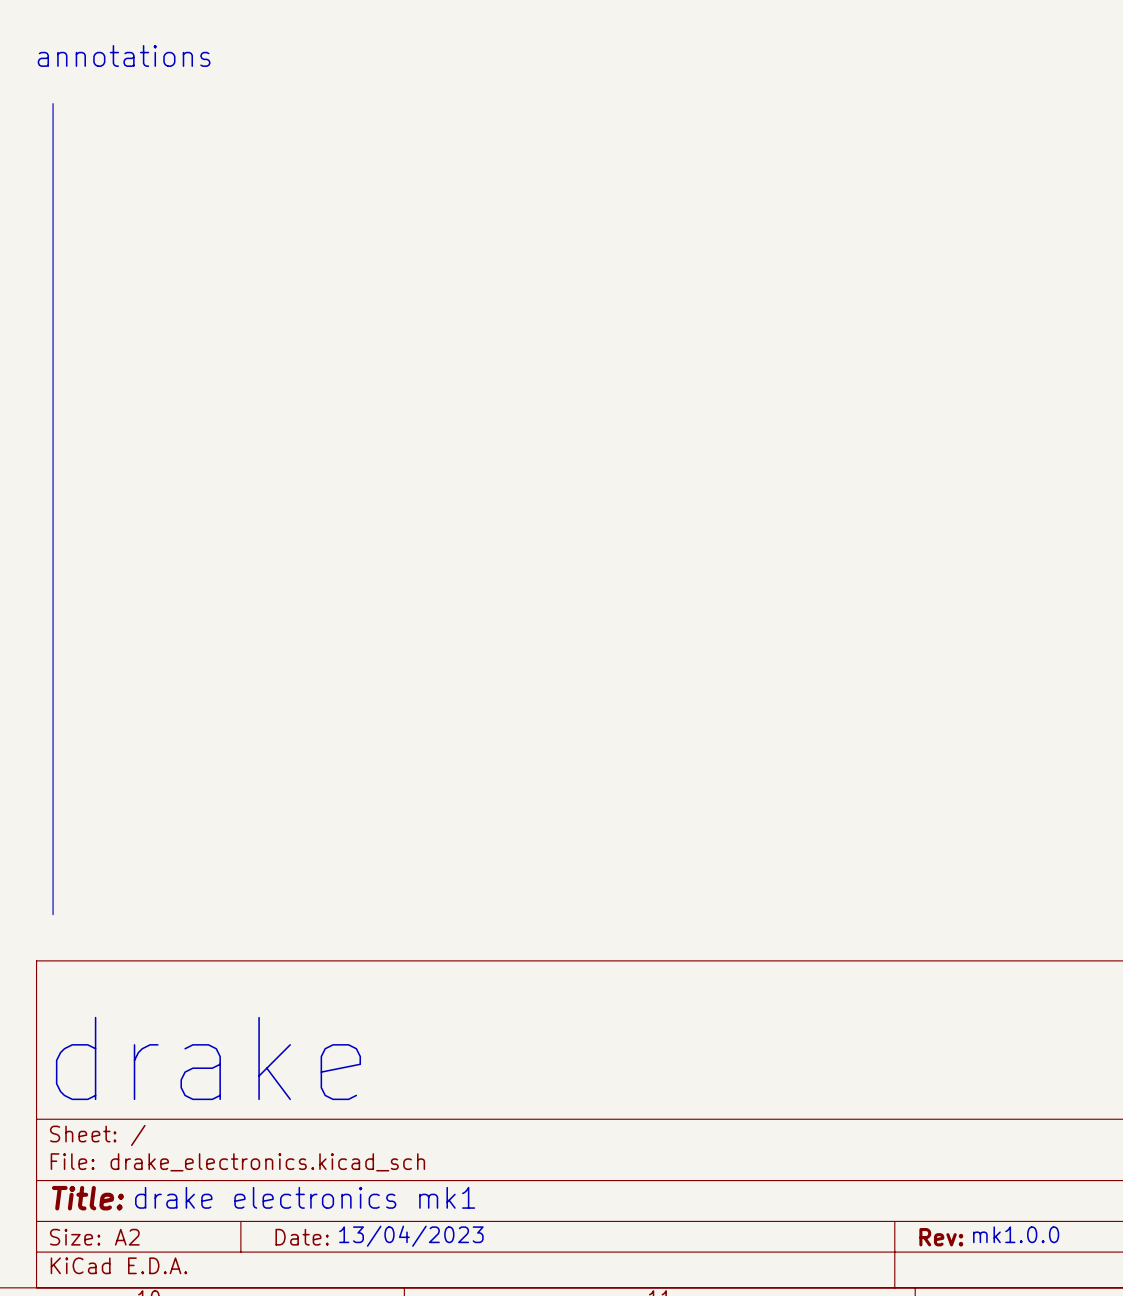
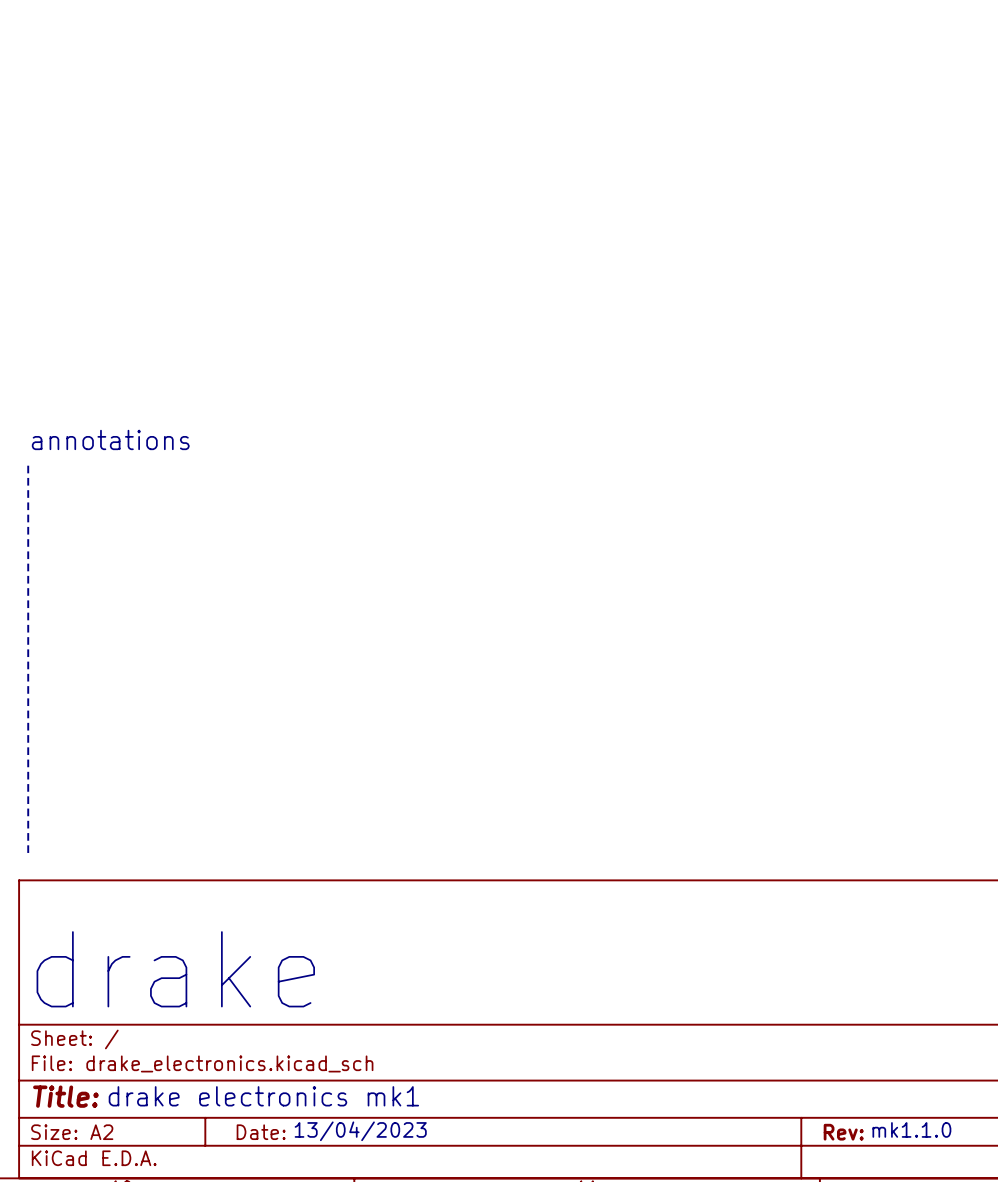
text: annotations (124, 55) -> none
line: (53, 103) (53, 914) -> none
text: none -> annotations (110, 439)
line: none -> (28, 465) (28, 855)
text: mk1.0.0 (1016, 1234) -> mk1.1.0 (911, 1129)

